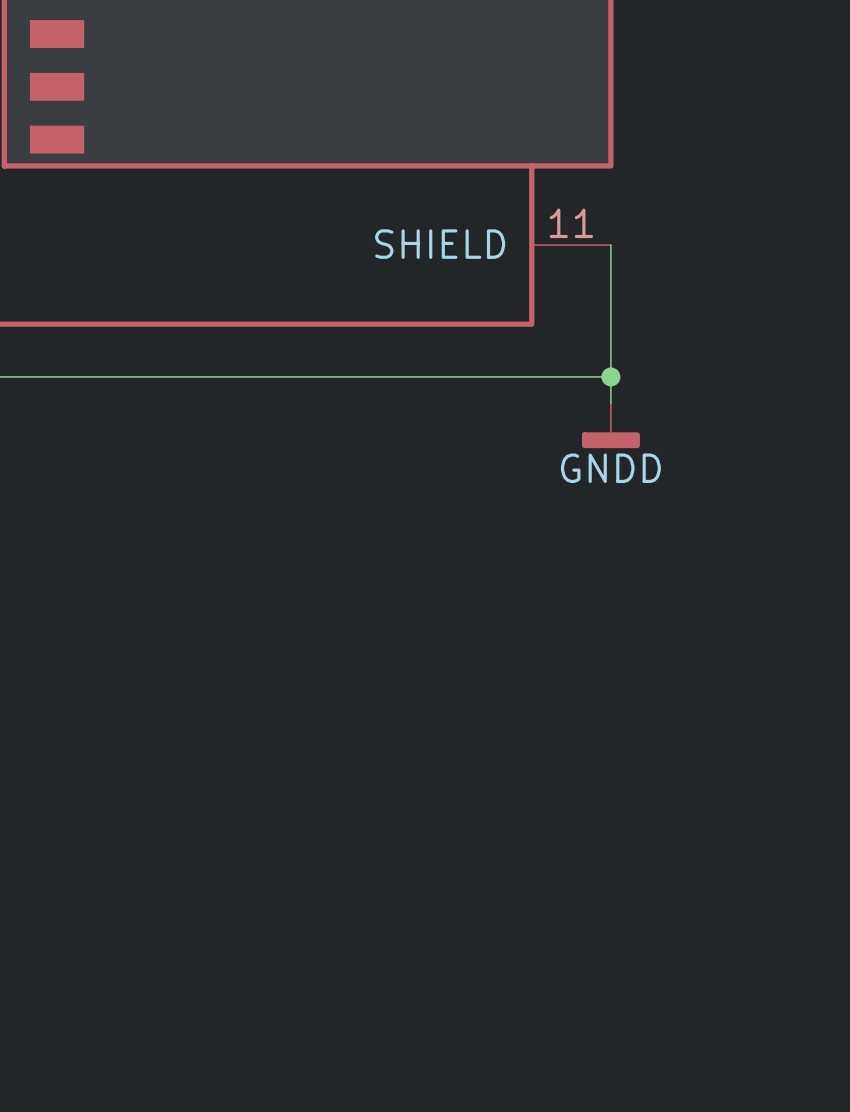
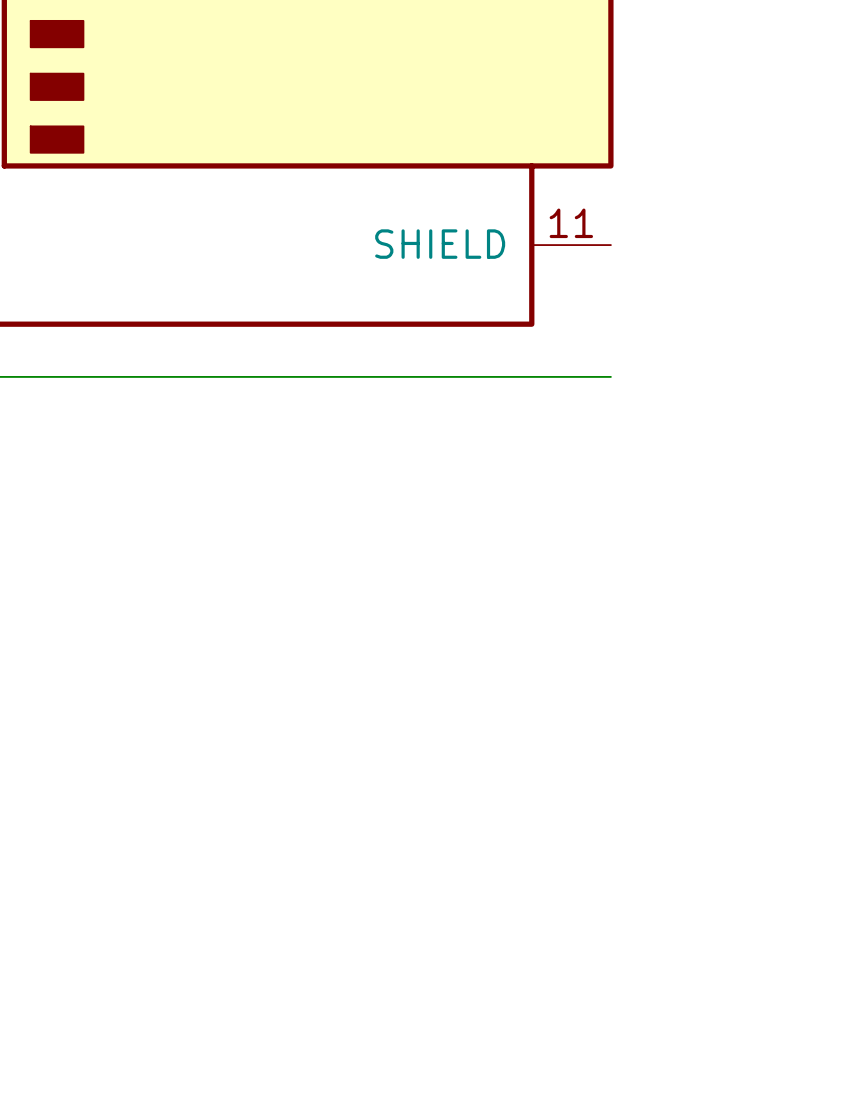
wire: (610, 245) (610, 403) -> none
junction: (610, 376) -> none
power symbol: GNDD (610, 425) -> none

